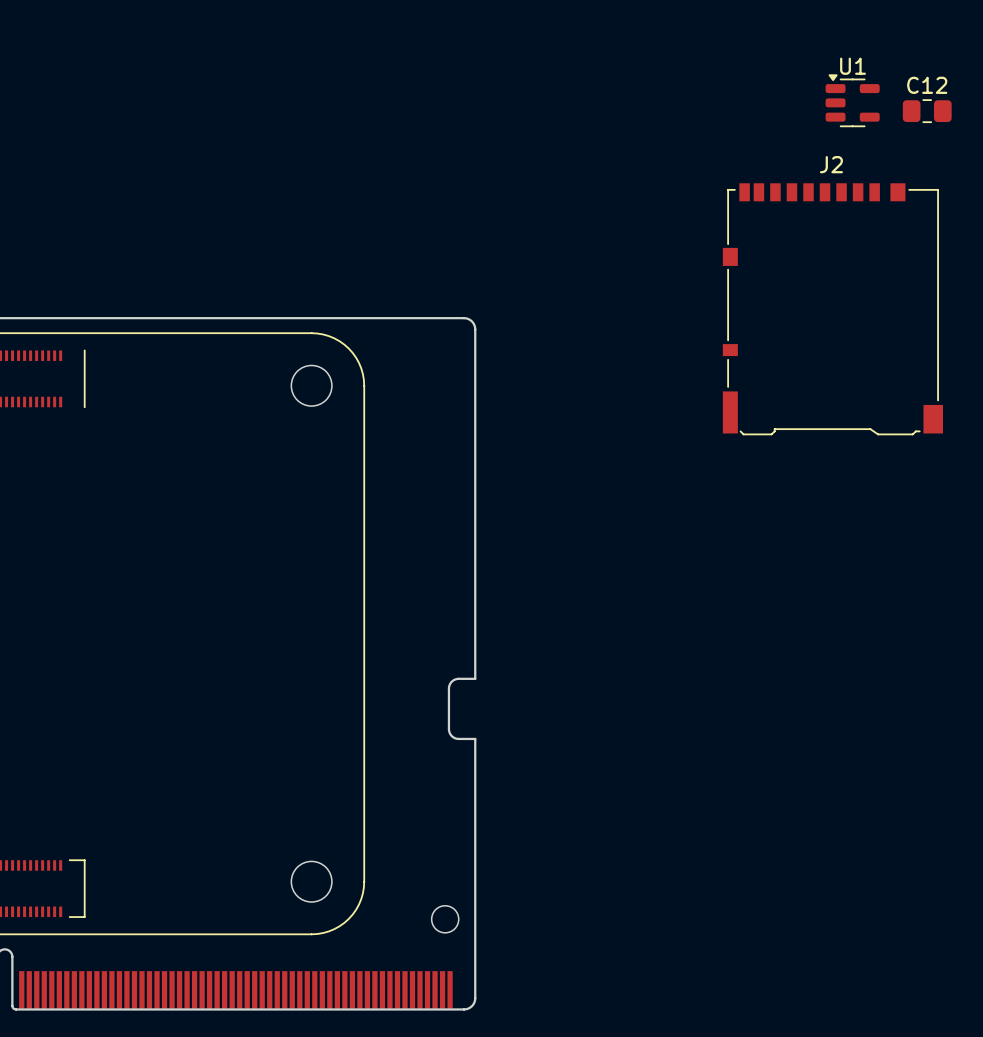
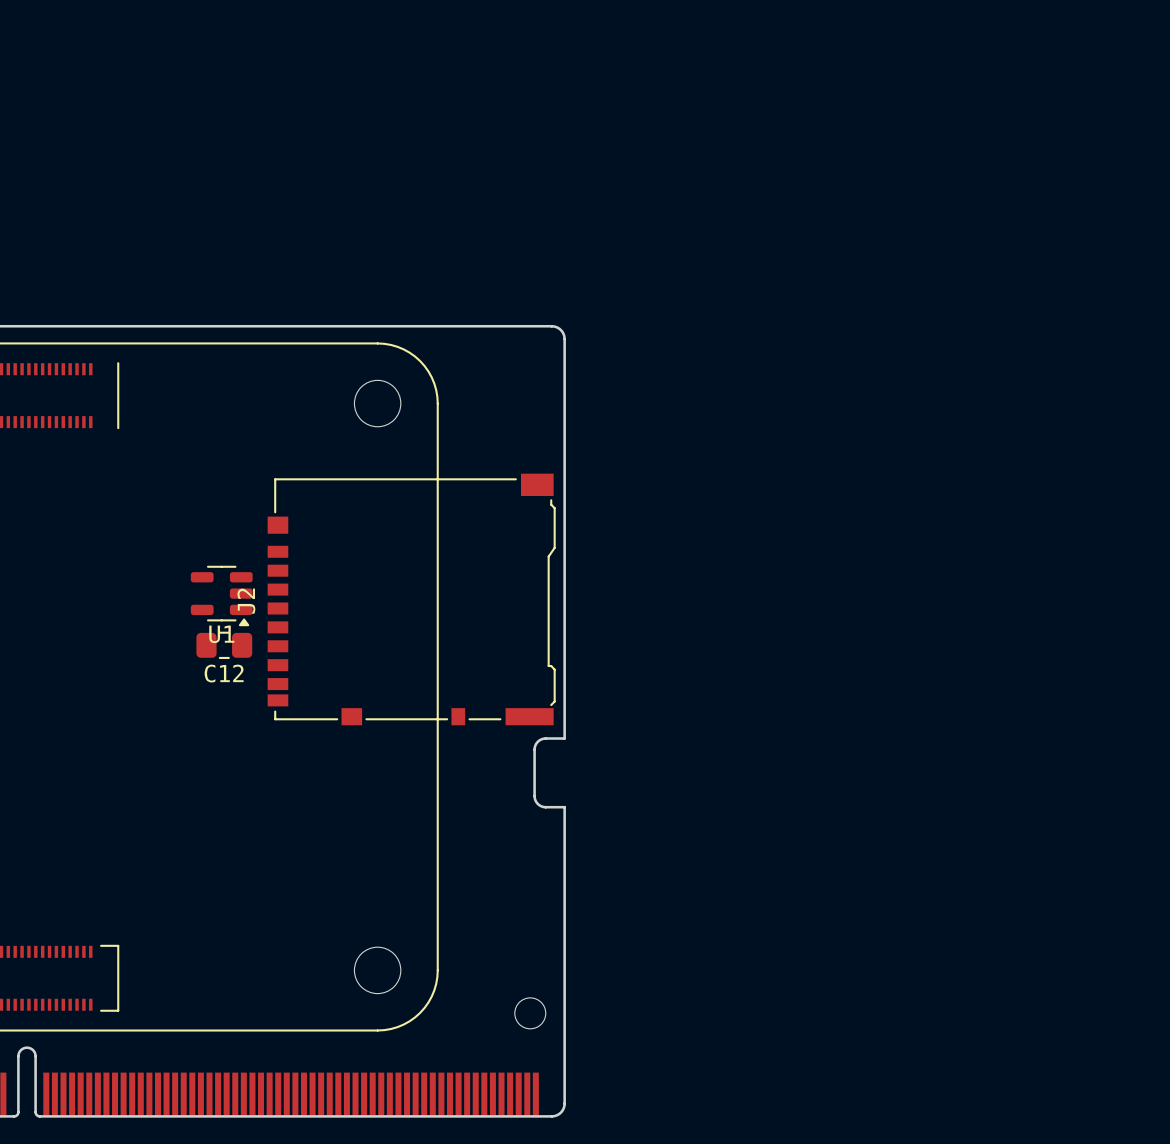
C12 name position: C12 (927, 85) -> C12 (224, 673)
U1 rotation: 0° (852, 100) -> 180° (221, 595)
U1 position: (852, 100) -> (221, 595)
C12 position: (927, 111) -> (224, 645)
J2 rotation: 0° (832, 309) -> 90° counterclockwise (411, 599)
J2 position: (832, 309) -> (411, 599)

